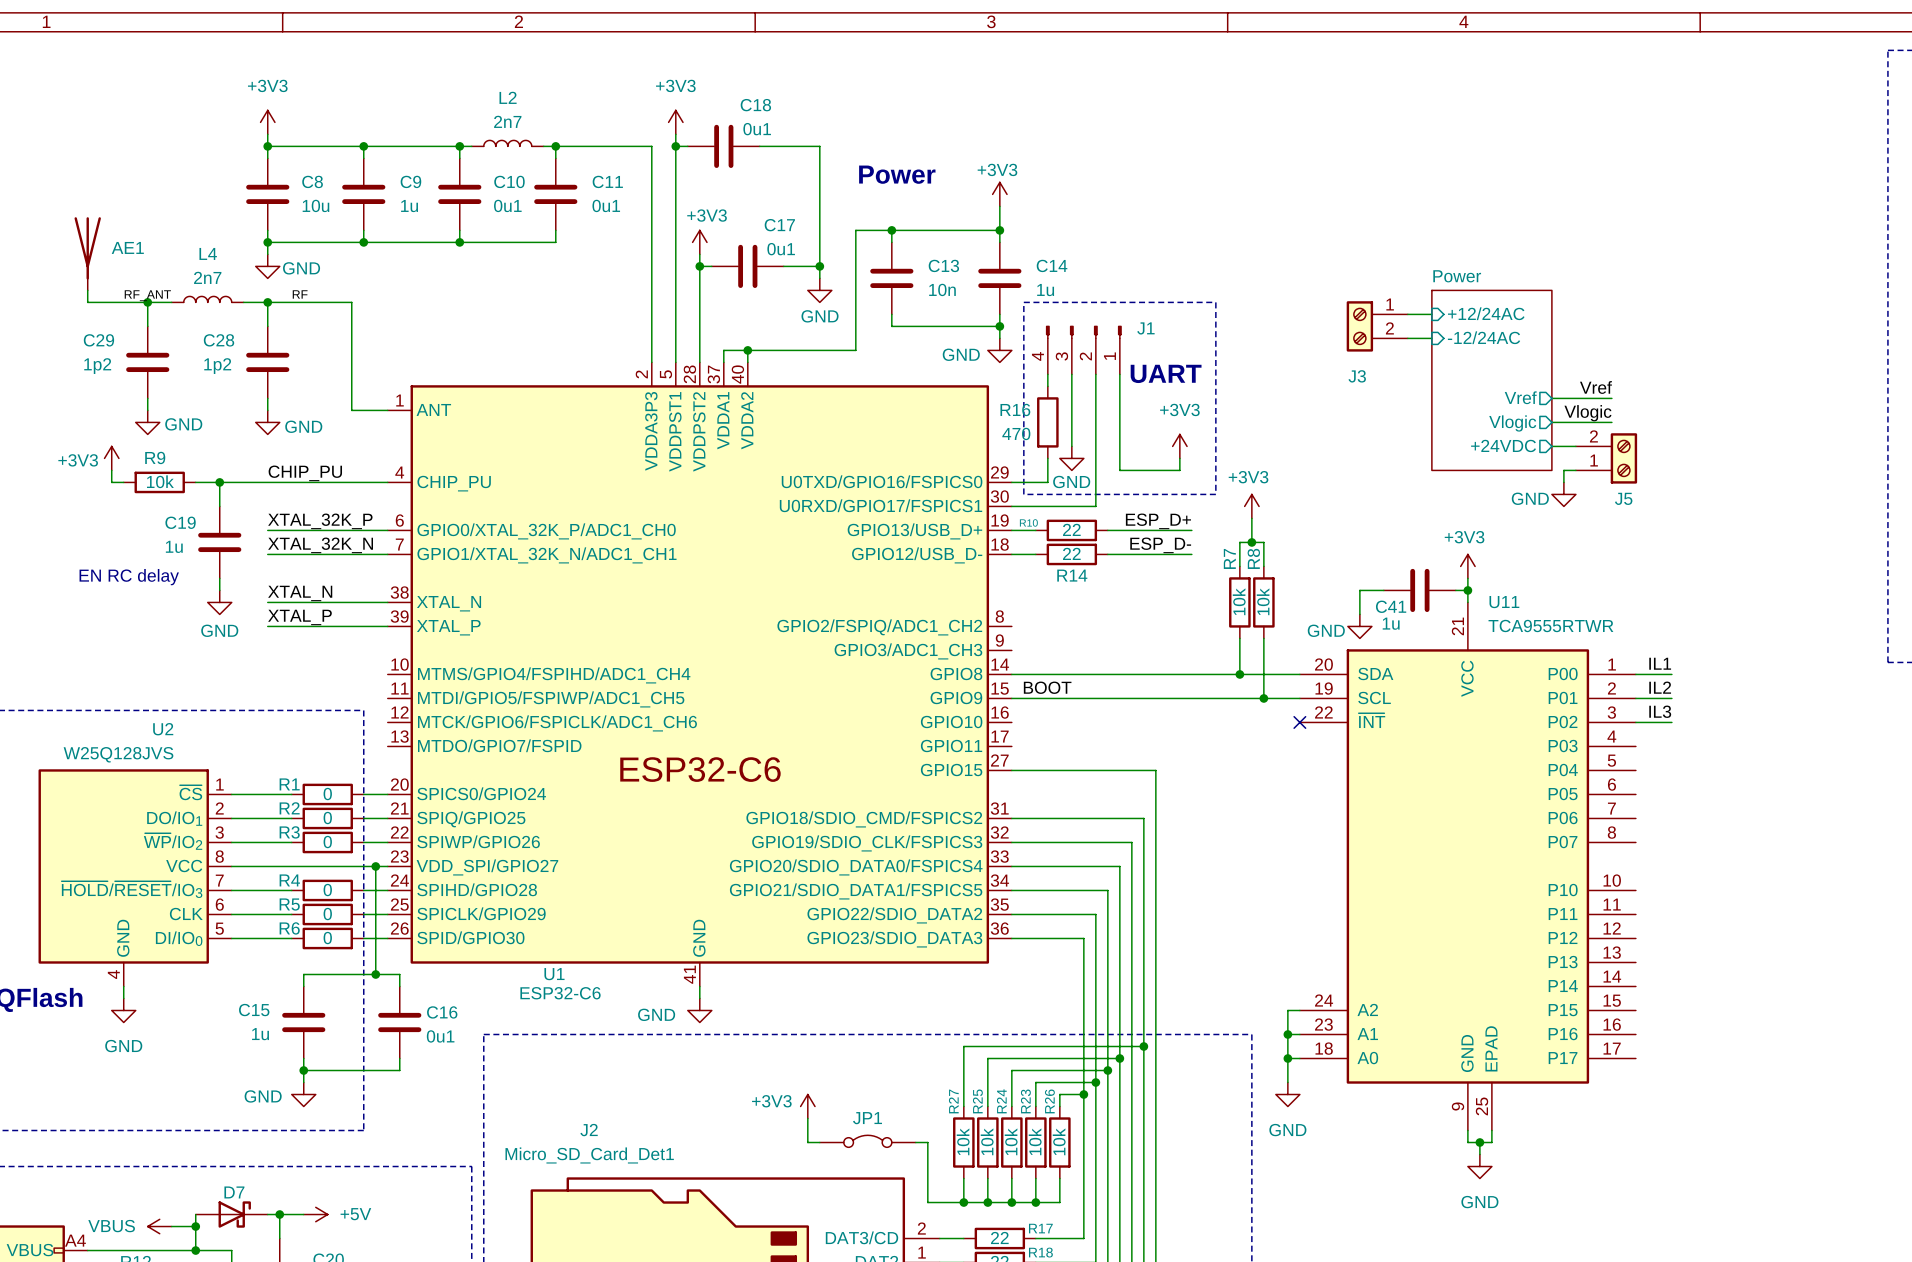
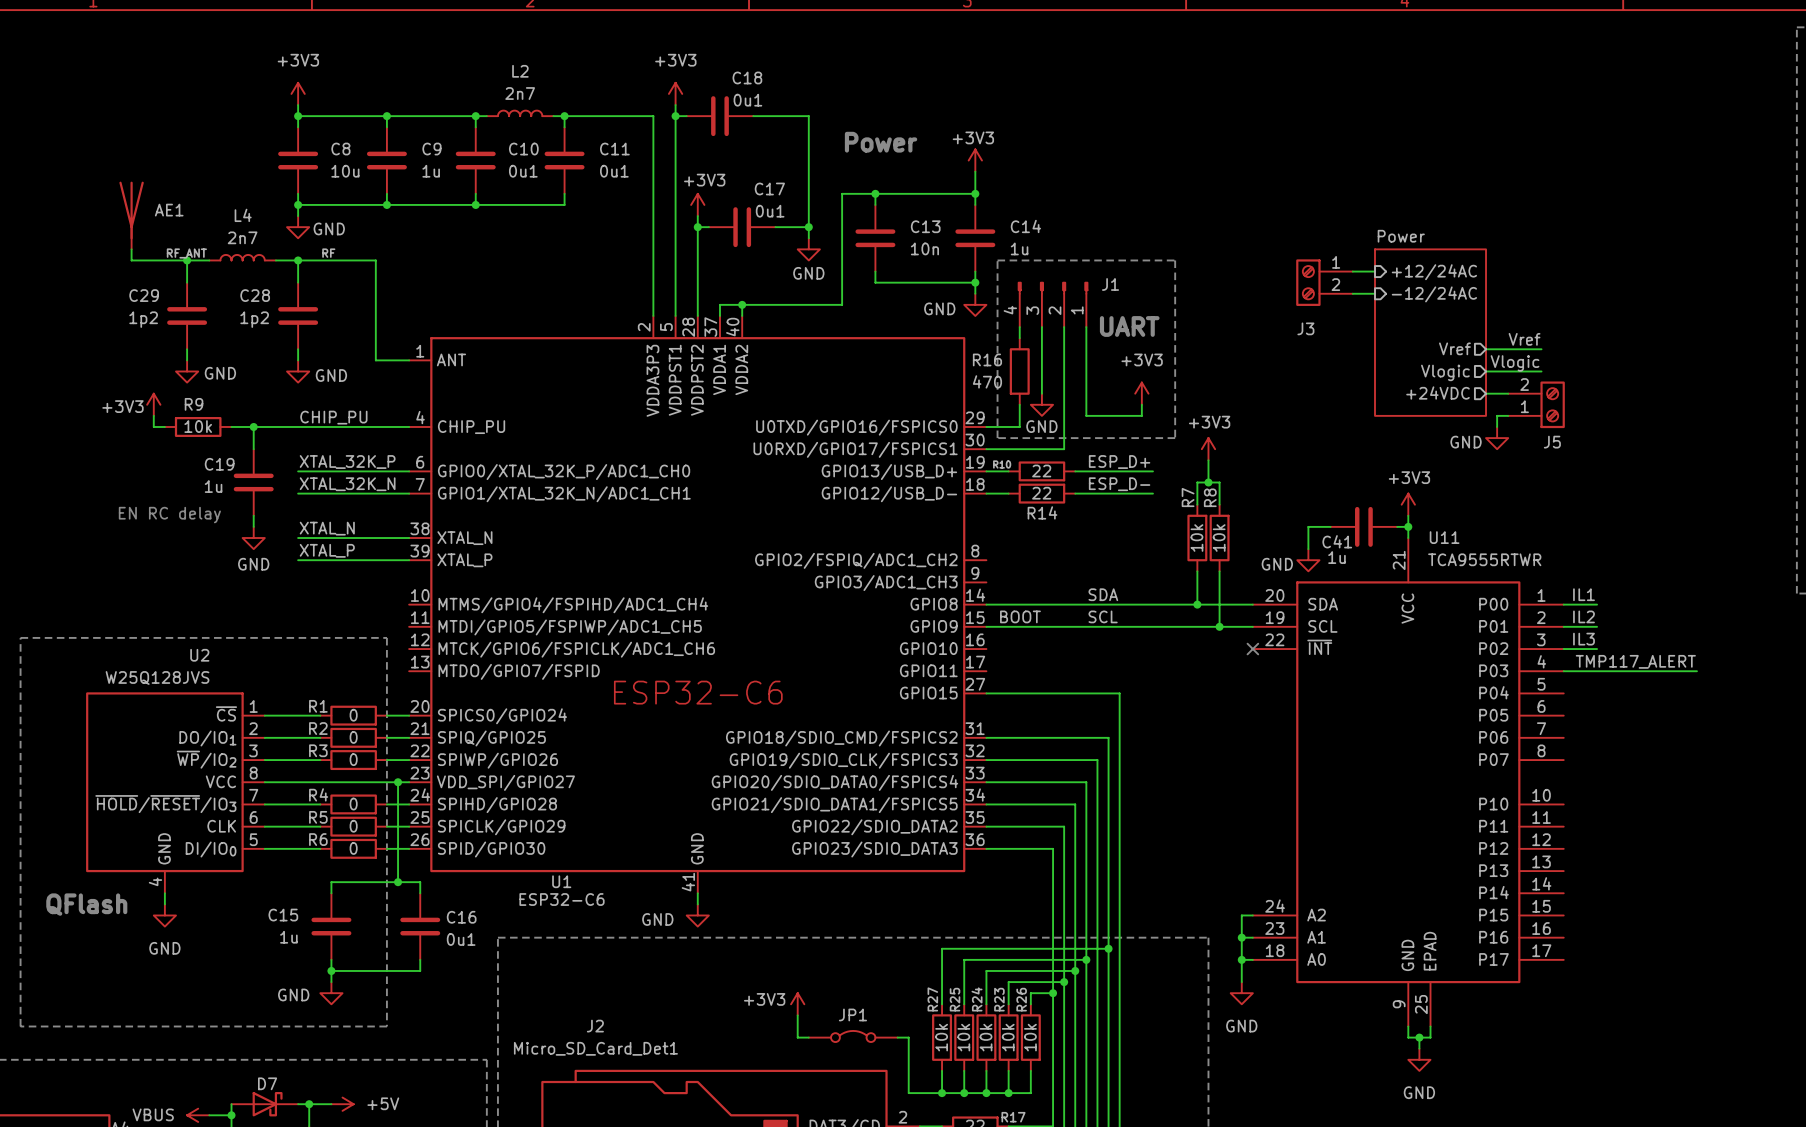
label: none -> SDA (1103, 594)
label: none -> SCL (1103, 616)
label: none -> TMP117_ALERT (1635, 661)
wire: none -> (1563, 671) (1696, 671)

